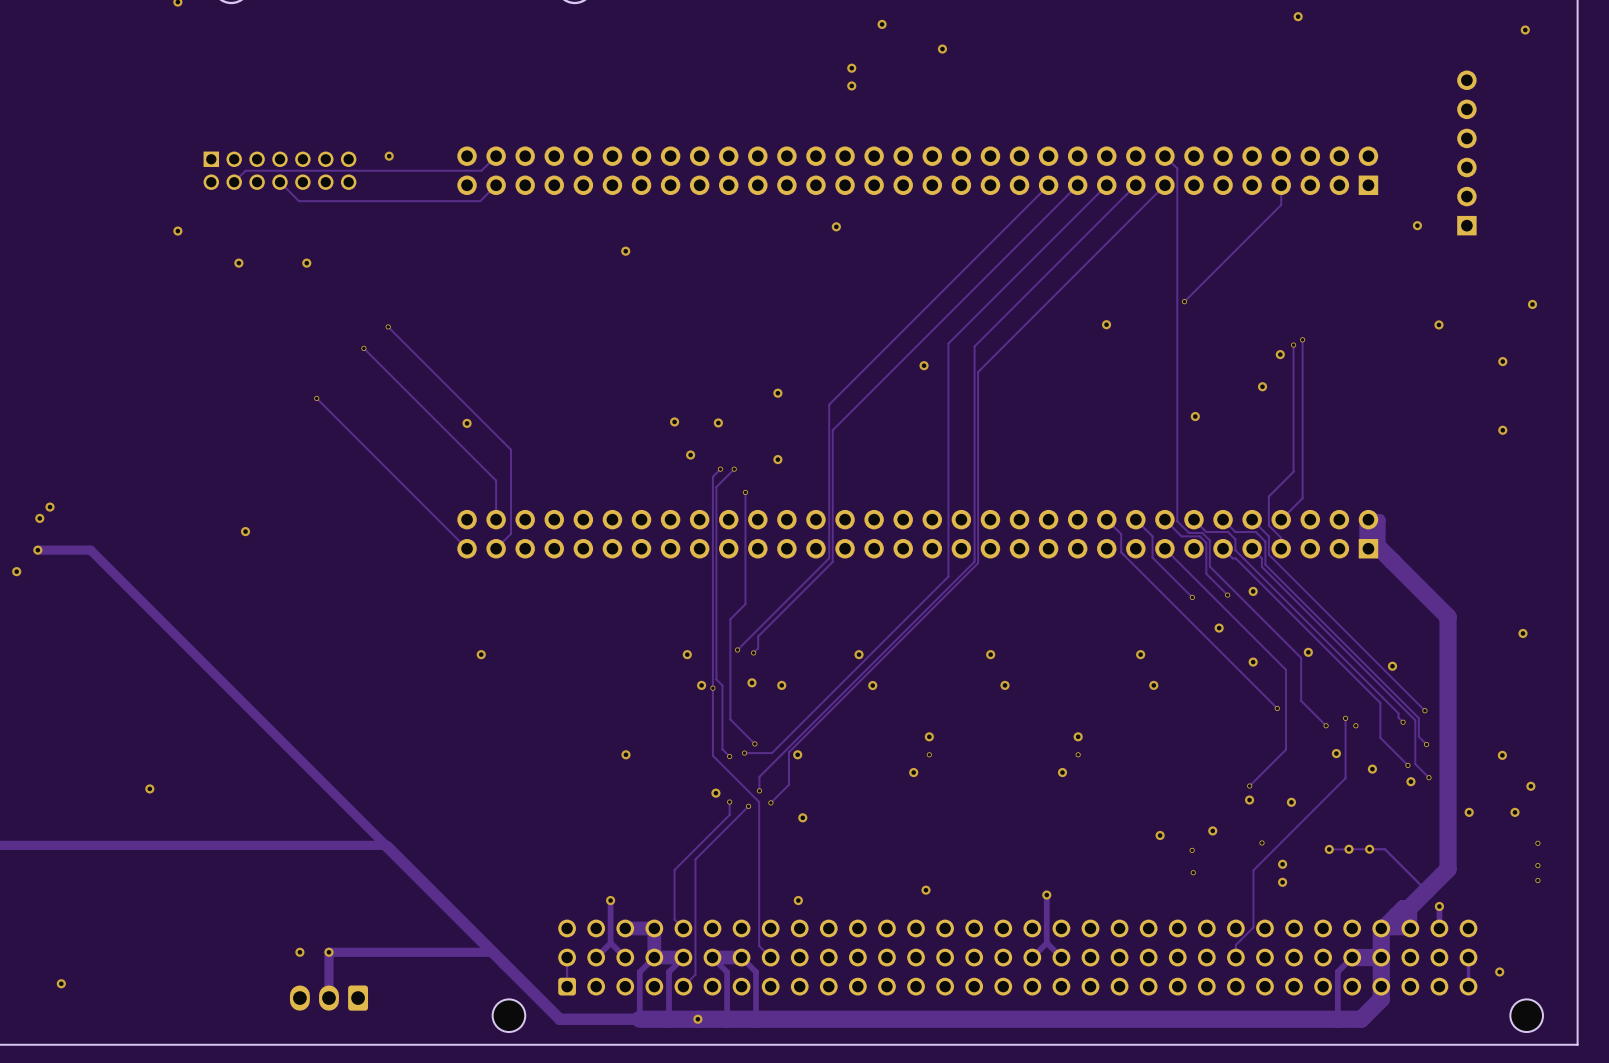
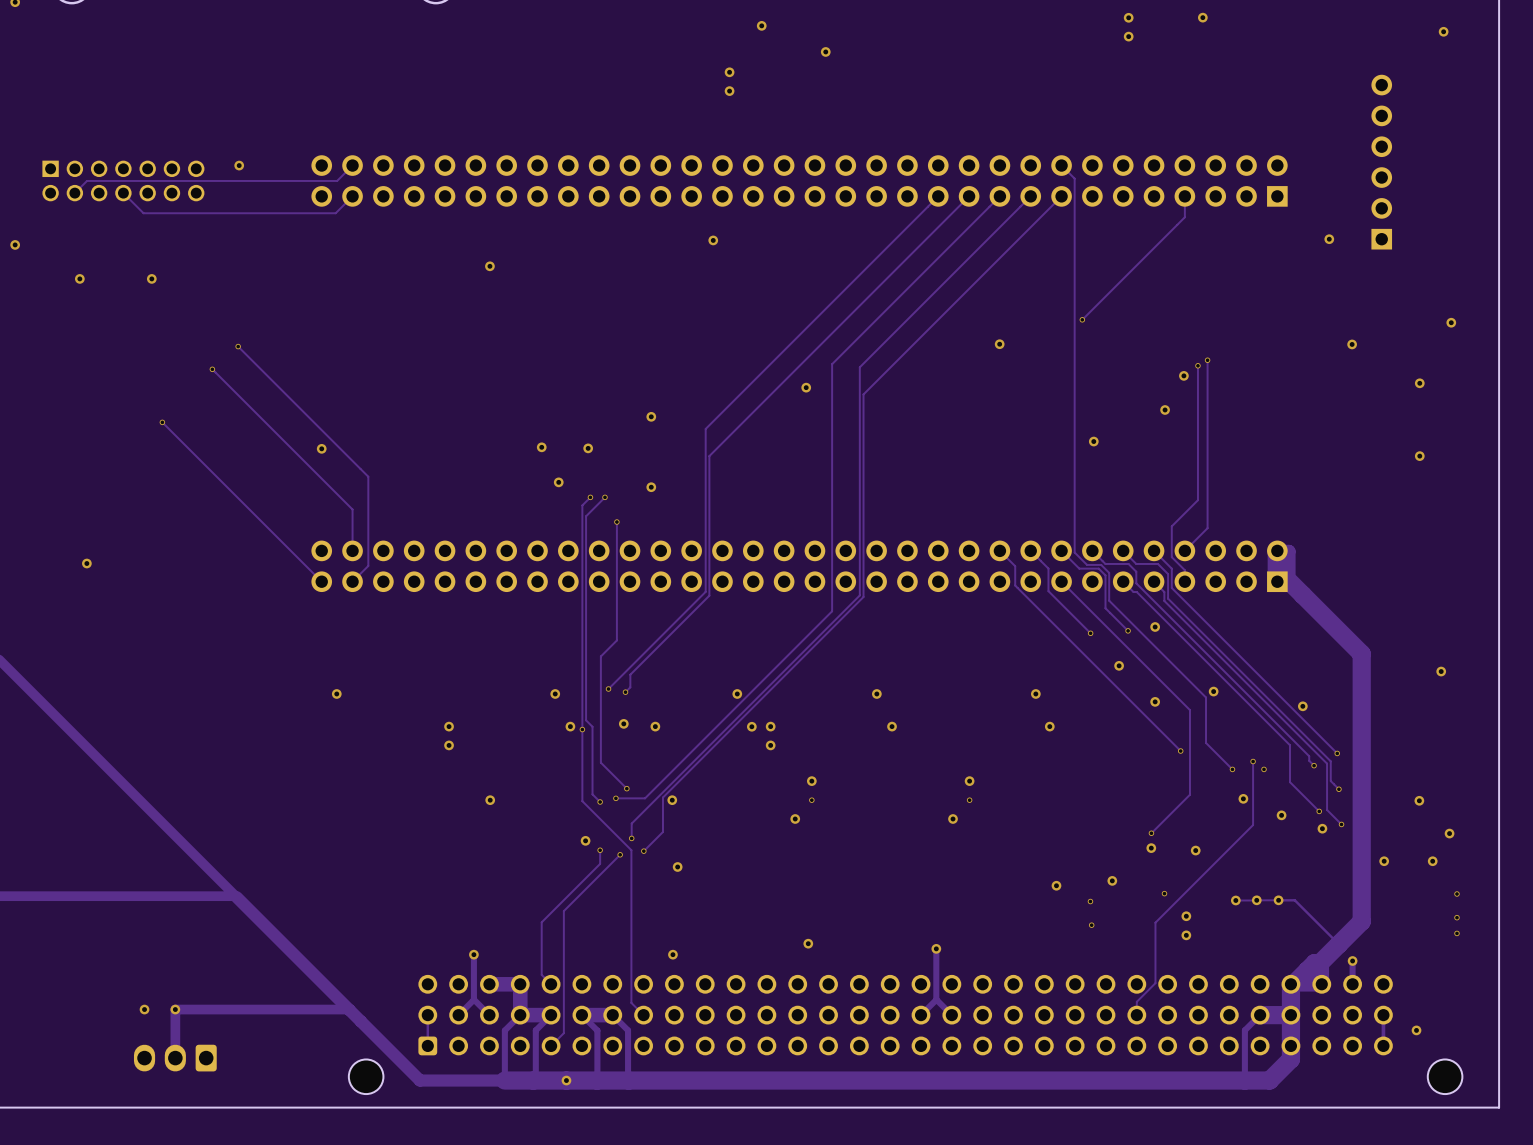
via: none -> (1128, 17)
via: none -> (1128, 36)
via: none -> (449, 726)
via: none -> (770, 726)
via: none -> (449, 745)
via: none -> (770, 745)

